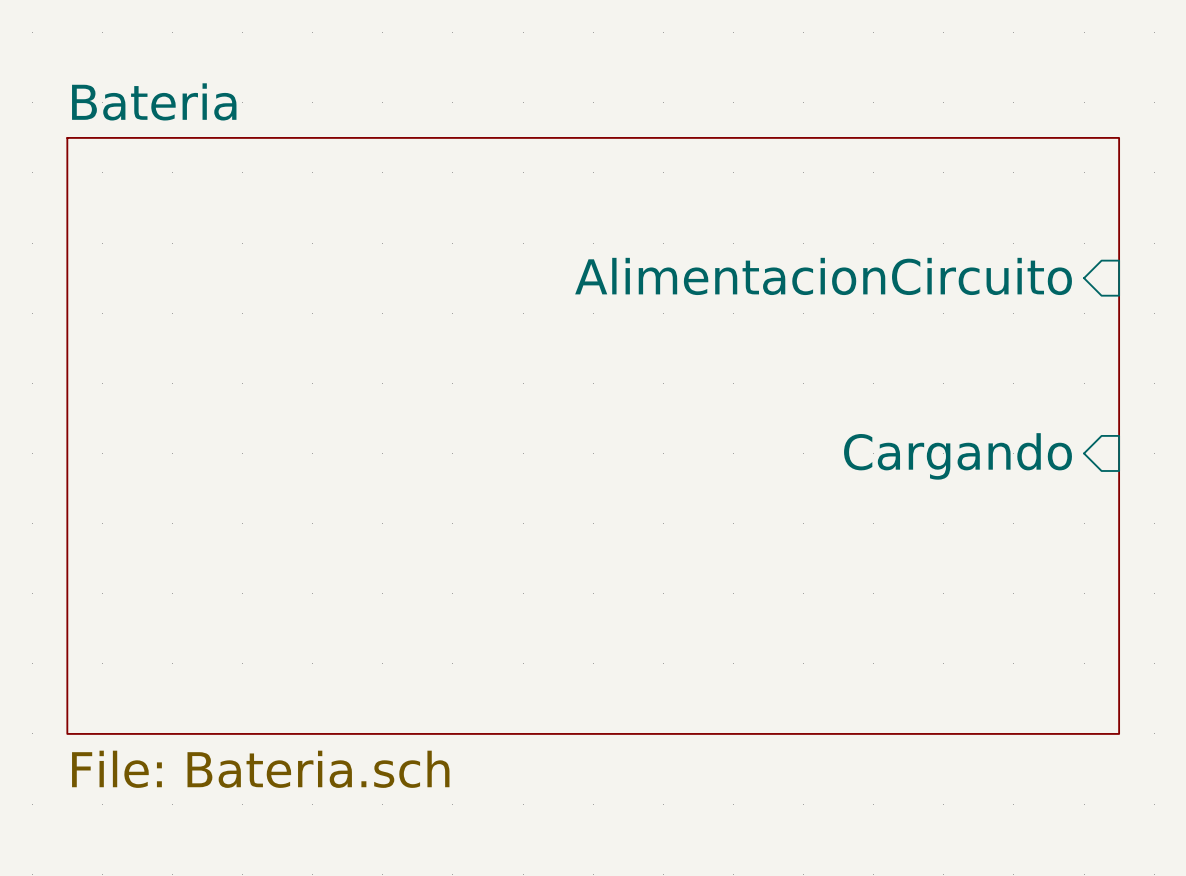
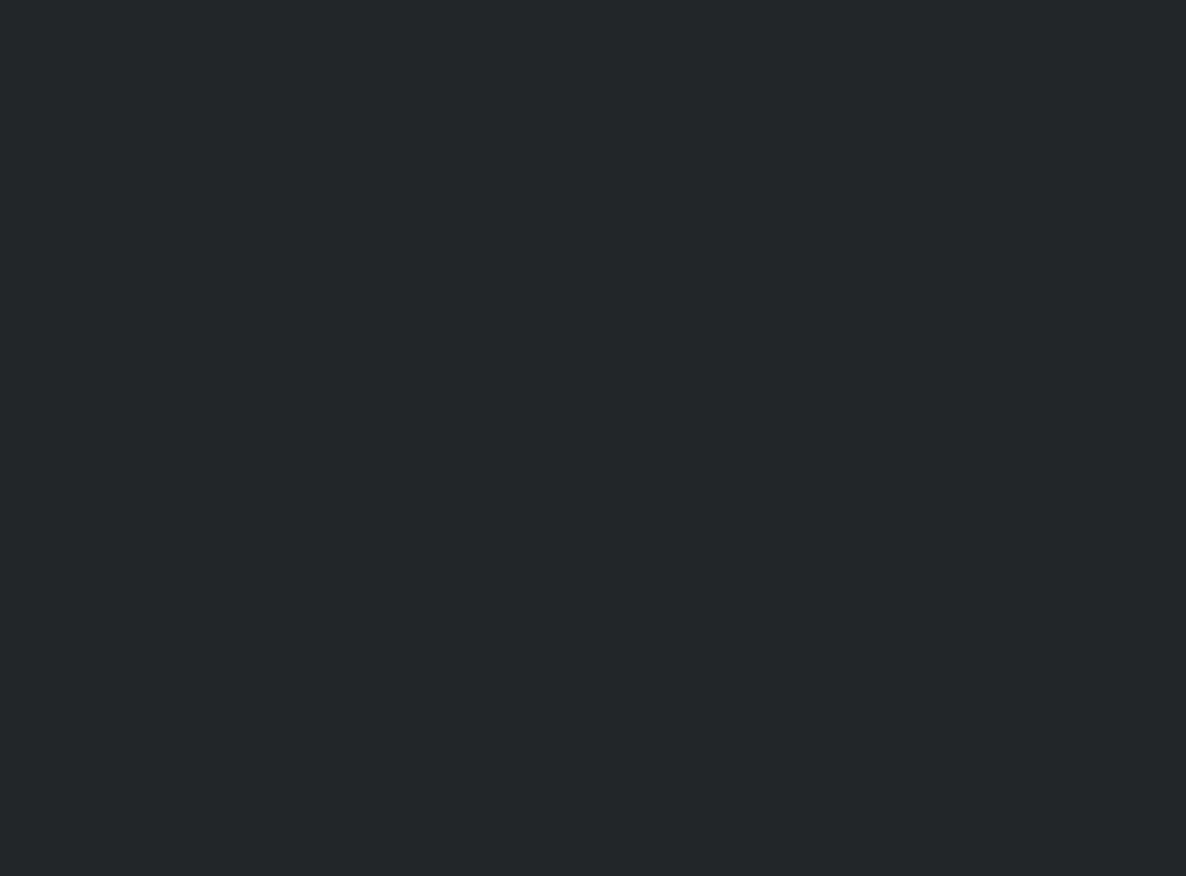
sheet pin: AlimentacionCircuito (823, 276) -> none
sheet Bateria: File: Bateria.sch (593, 435) -> none
sheet pin: Cargando (958, 456) -> none

